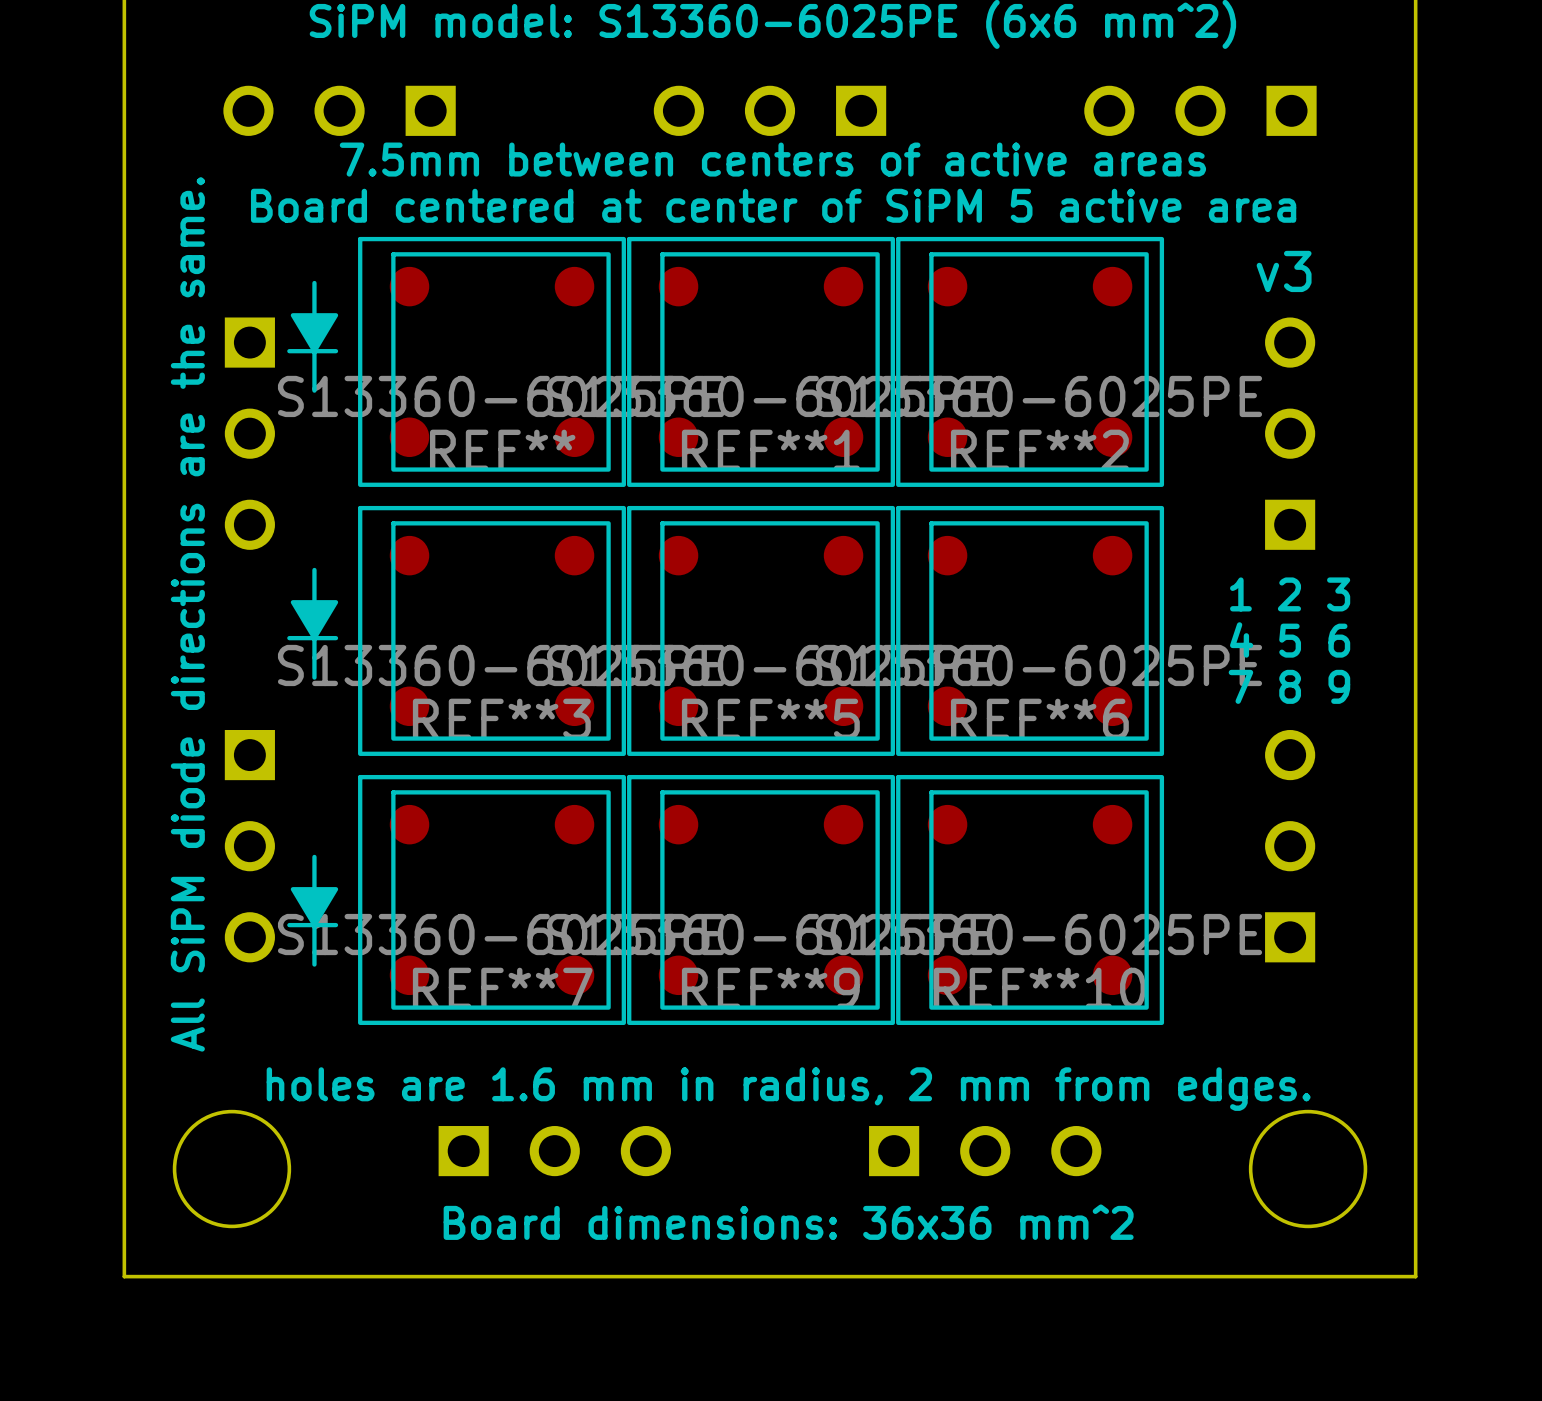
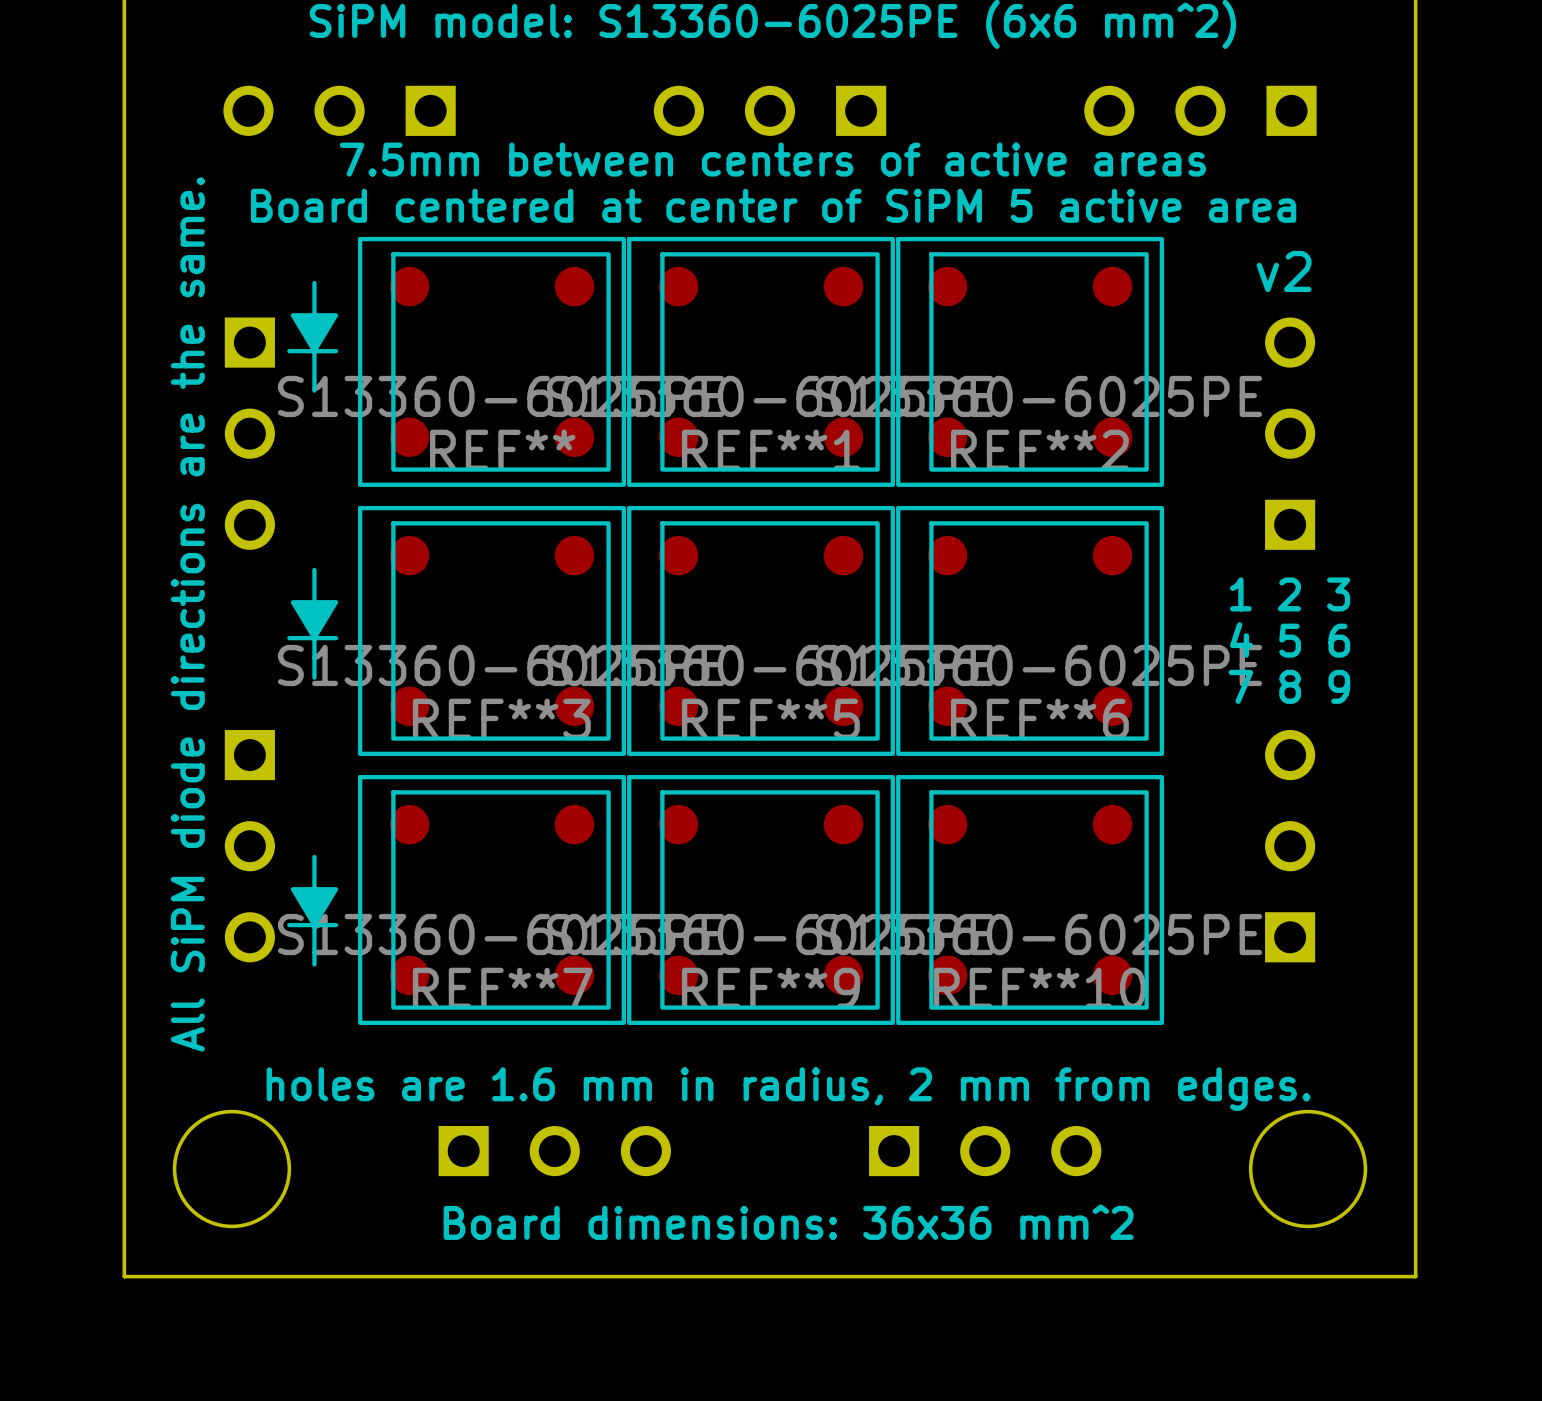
text: v3 (1284, 271) -> v2 (1284, 271)

